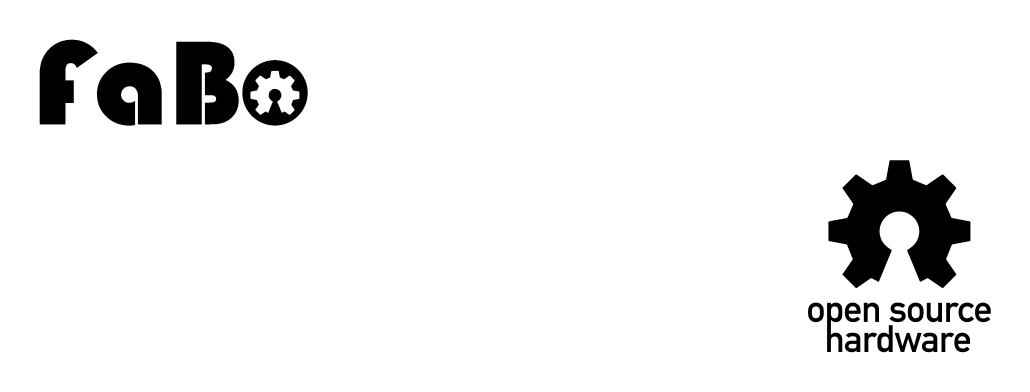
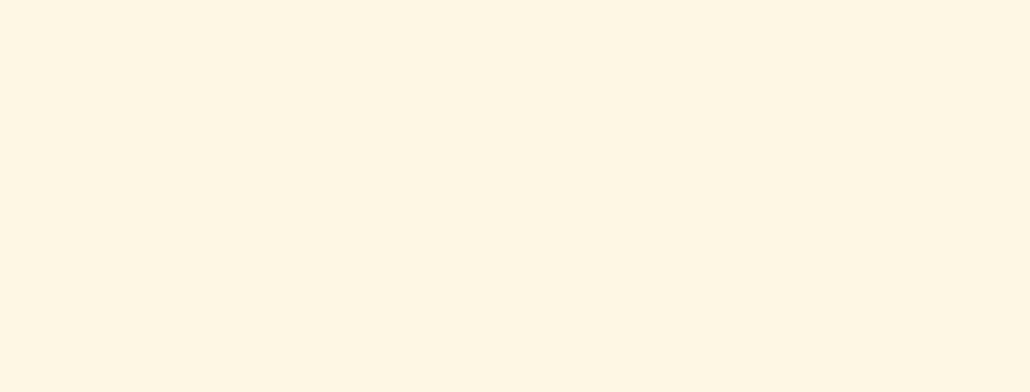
part: (173, 82) -> none
part: (899, 256) -> none

